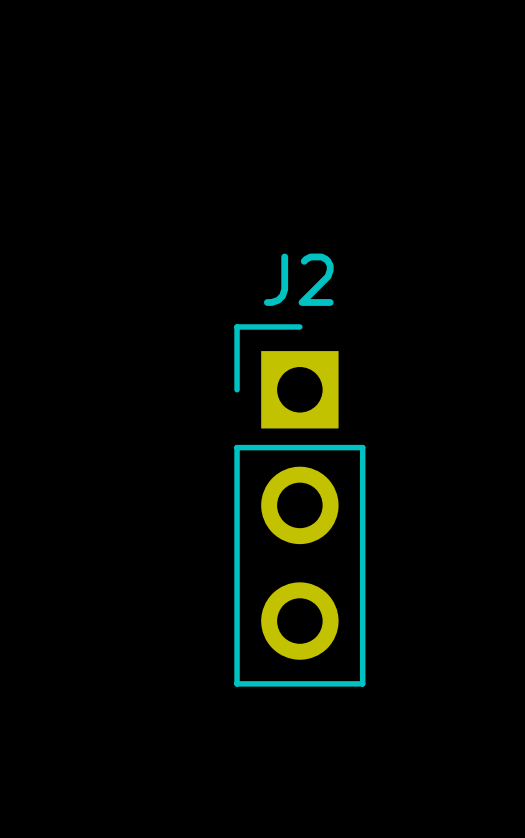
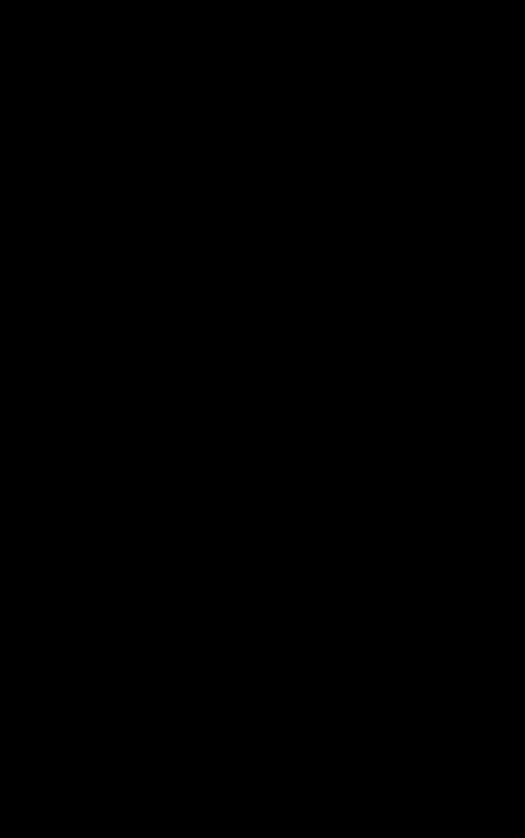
J2: (299, 505) -> none

